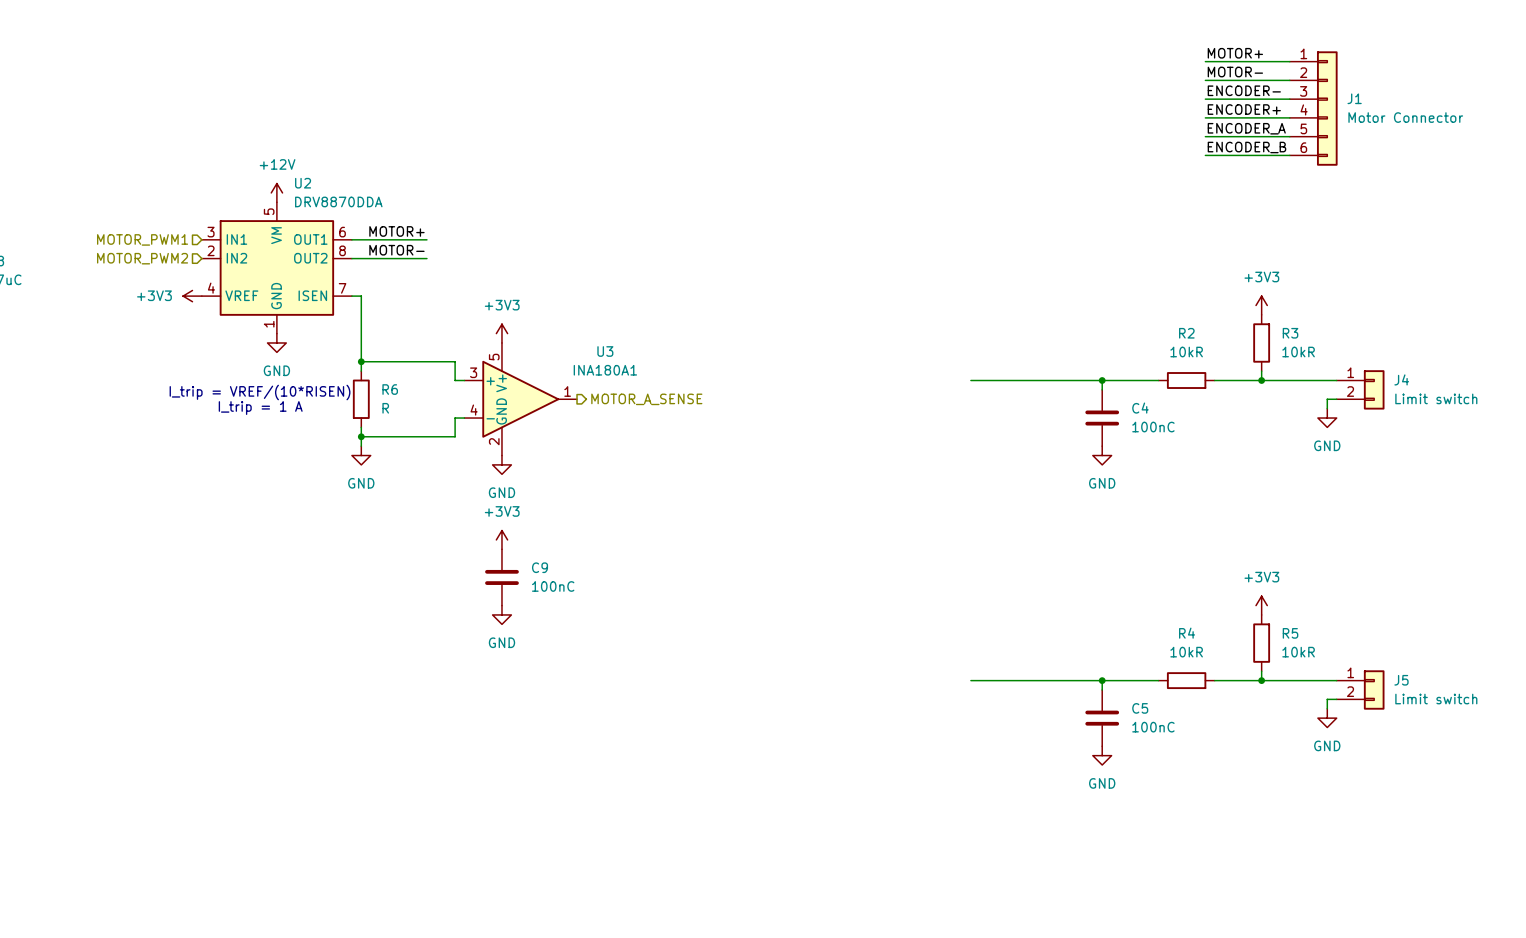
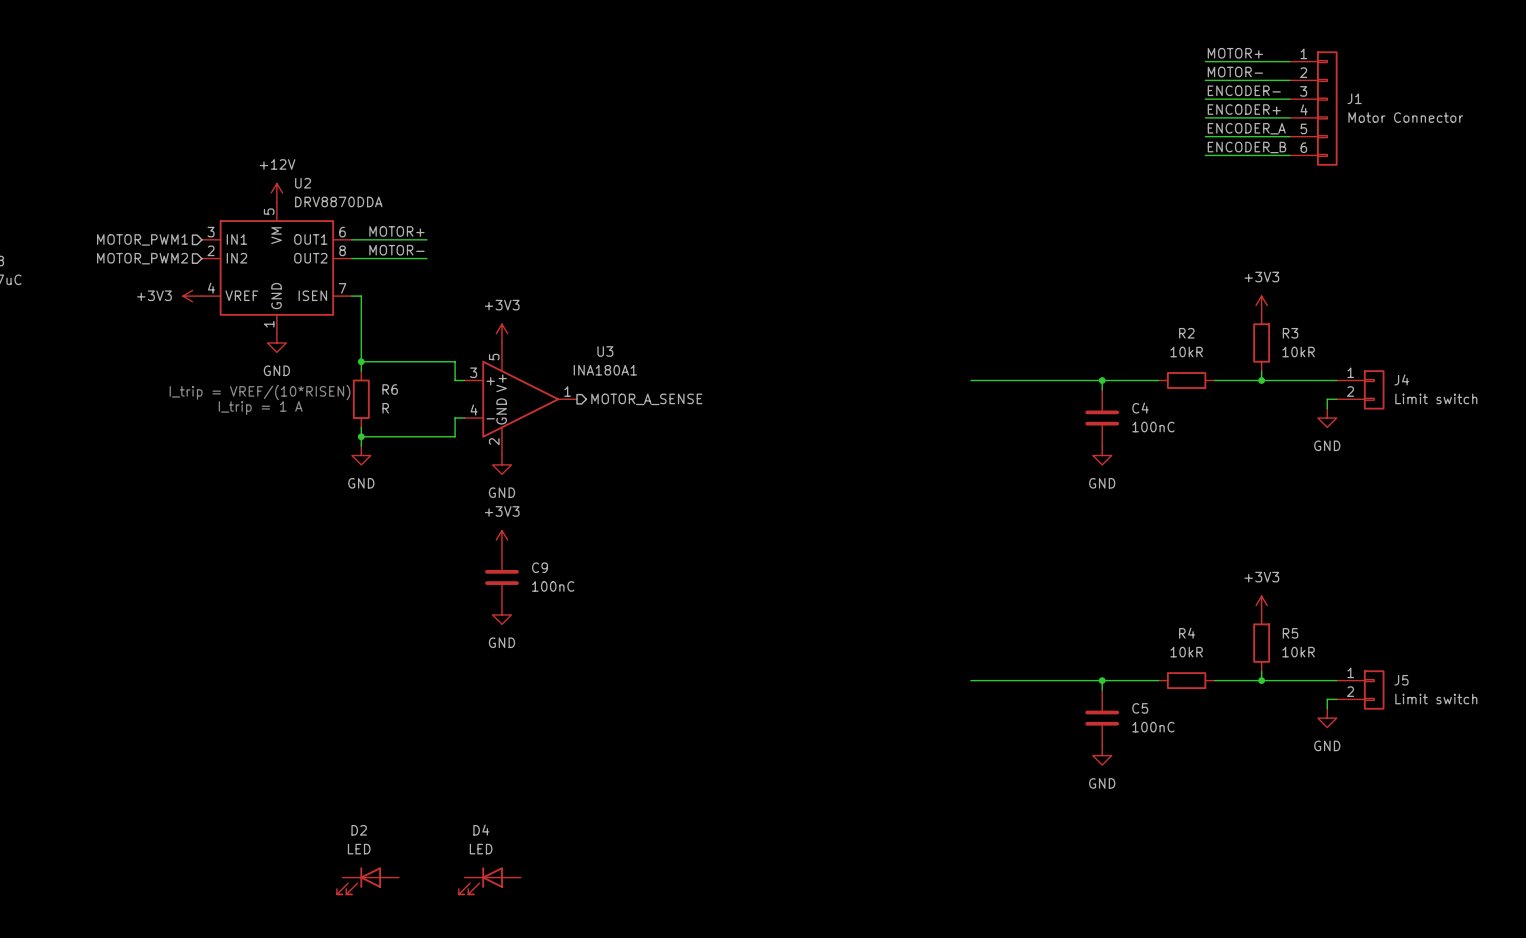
D2: none -> LED (367, 880)
D4: none -> LED (489, 880)

